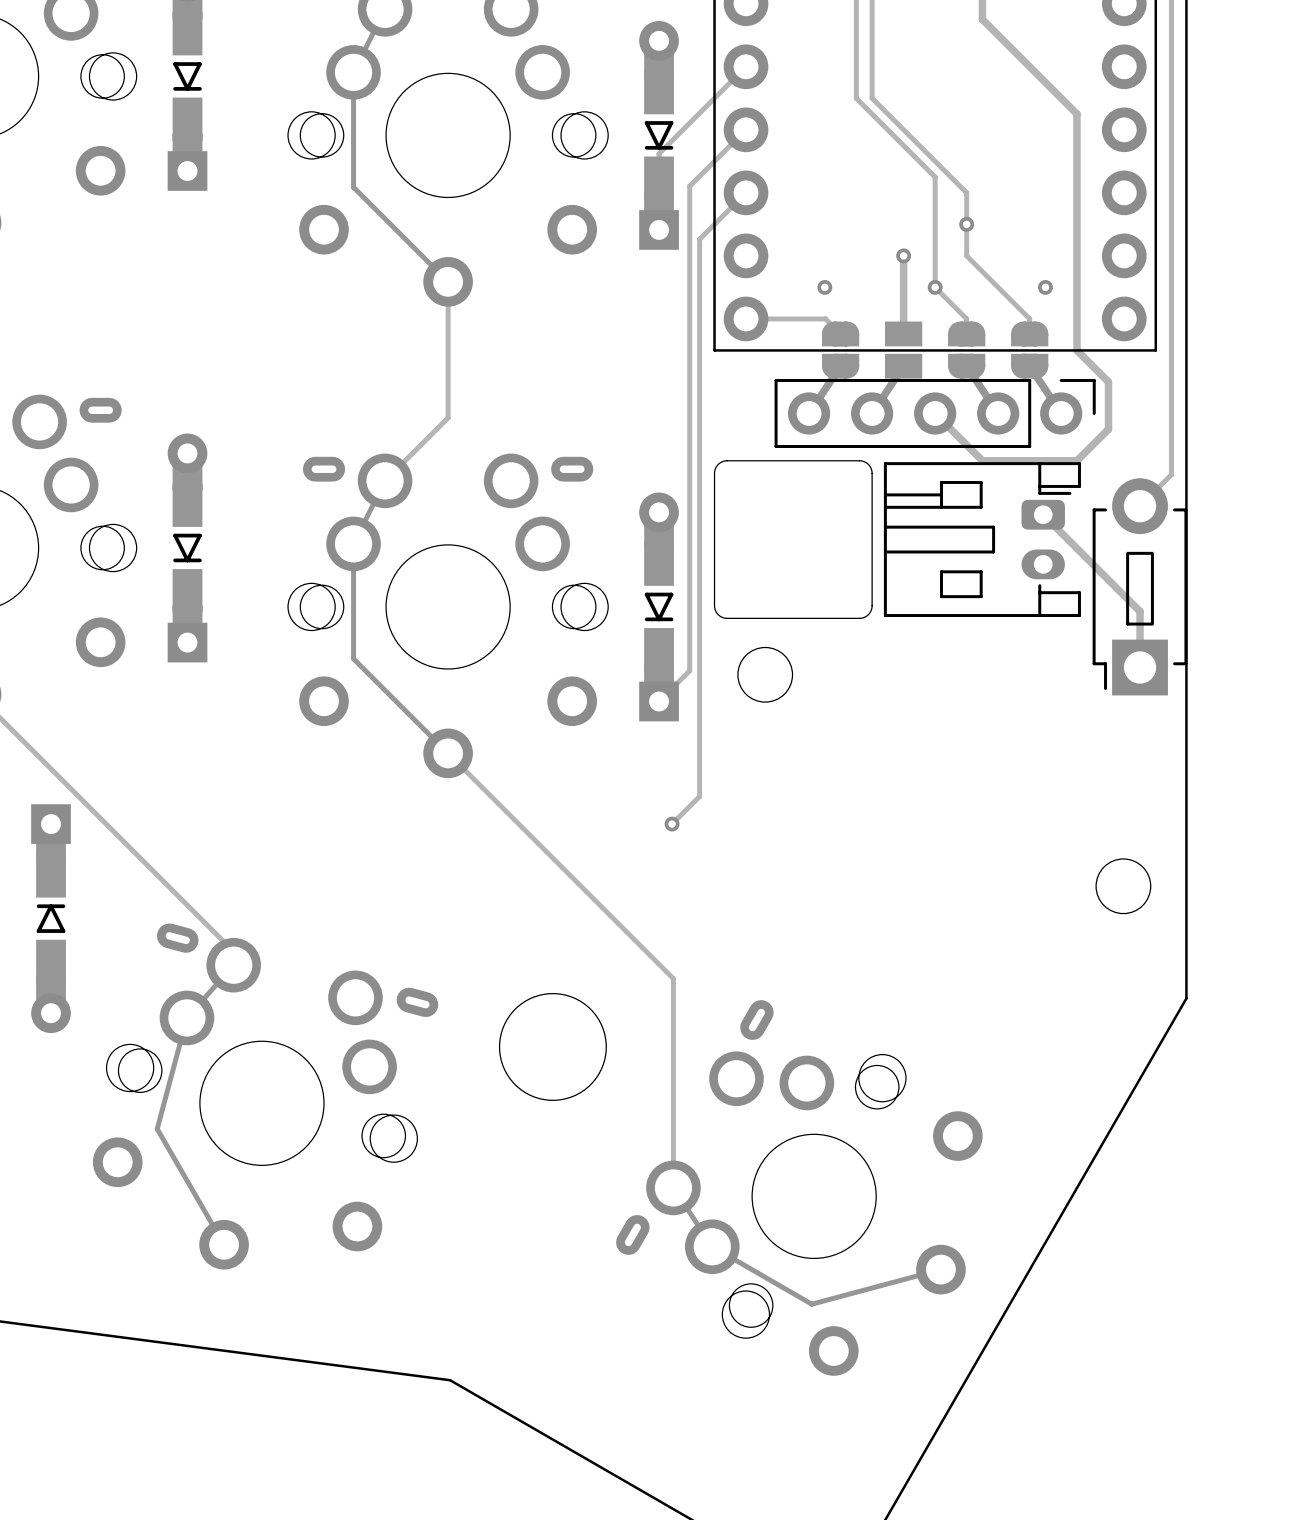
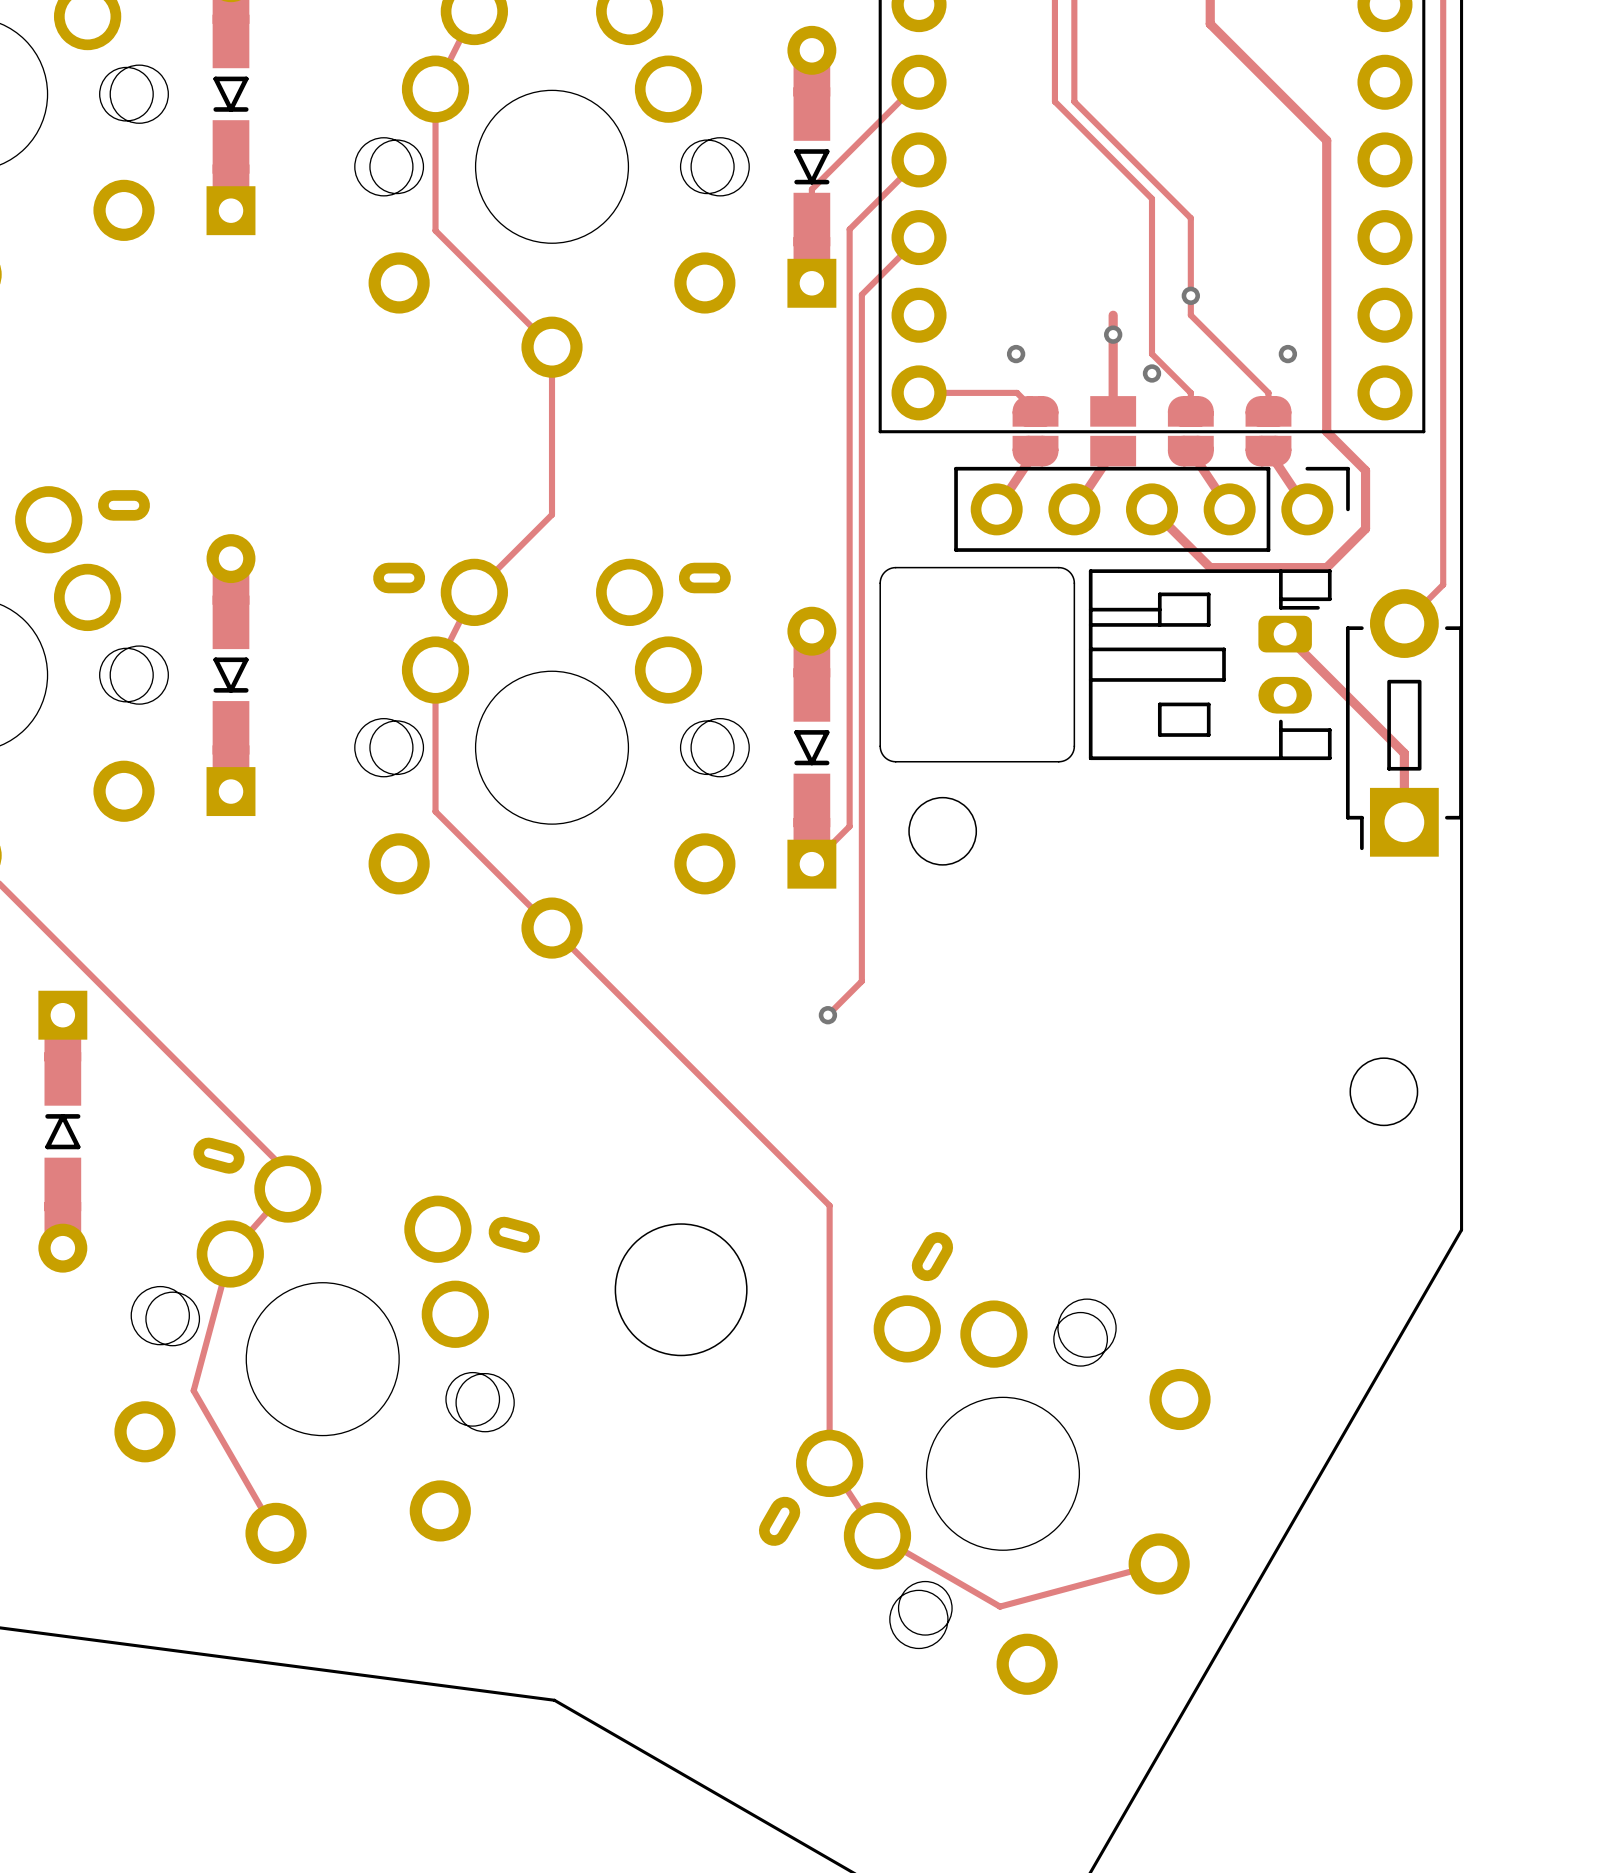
track: (856, 82) (856, 98) (935, 177) -> none
track: (872, 82) (872, 98) -> (1054, 101) (1074, 121)
track: none -> (1074, 101) (1190, 218) (1190, 237)
track: (935, 161) (966, 192) -> (1152, 198) (1152, 218)
via position: (966, 224) -> (1190, 295)
via position: (903, 255) -> (1113, 334)
via position: (935, 287) -> (1152, 373)

